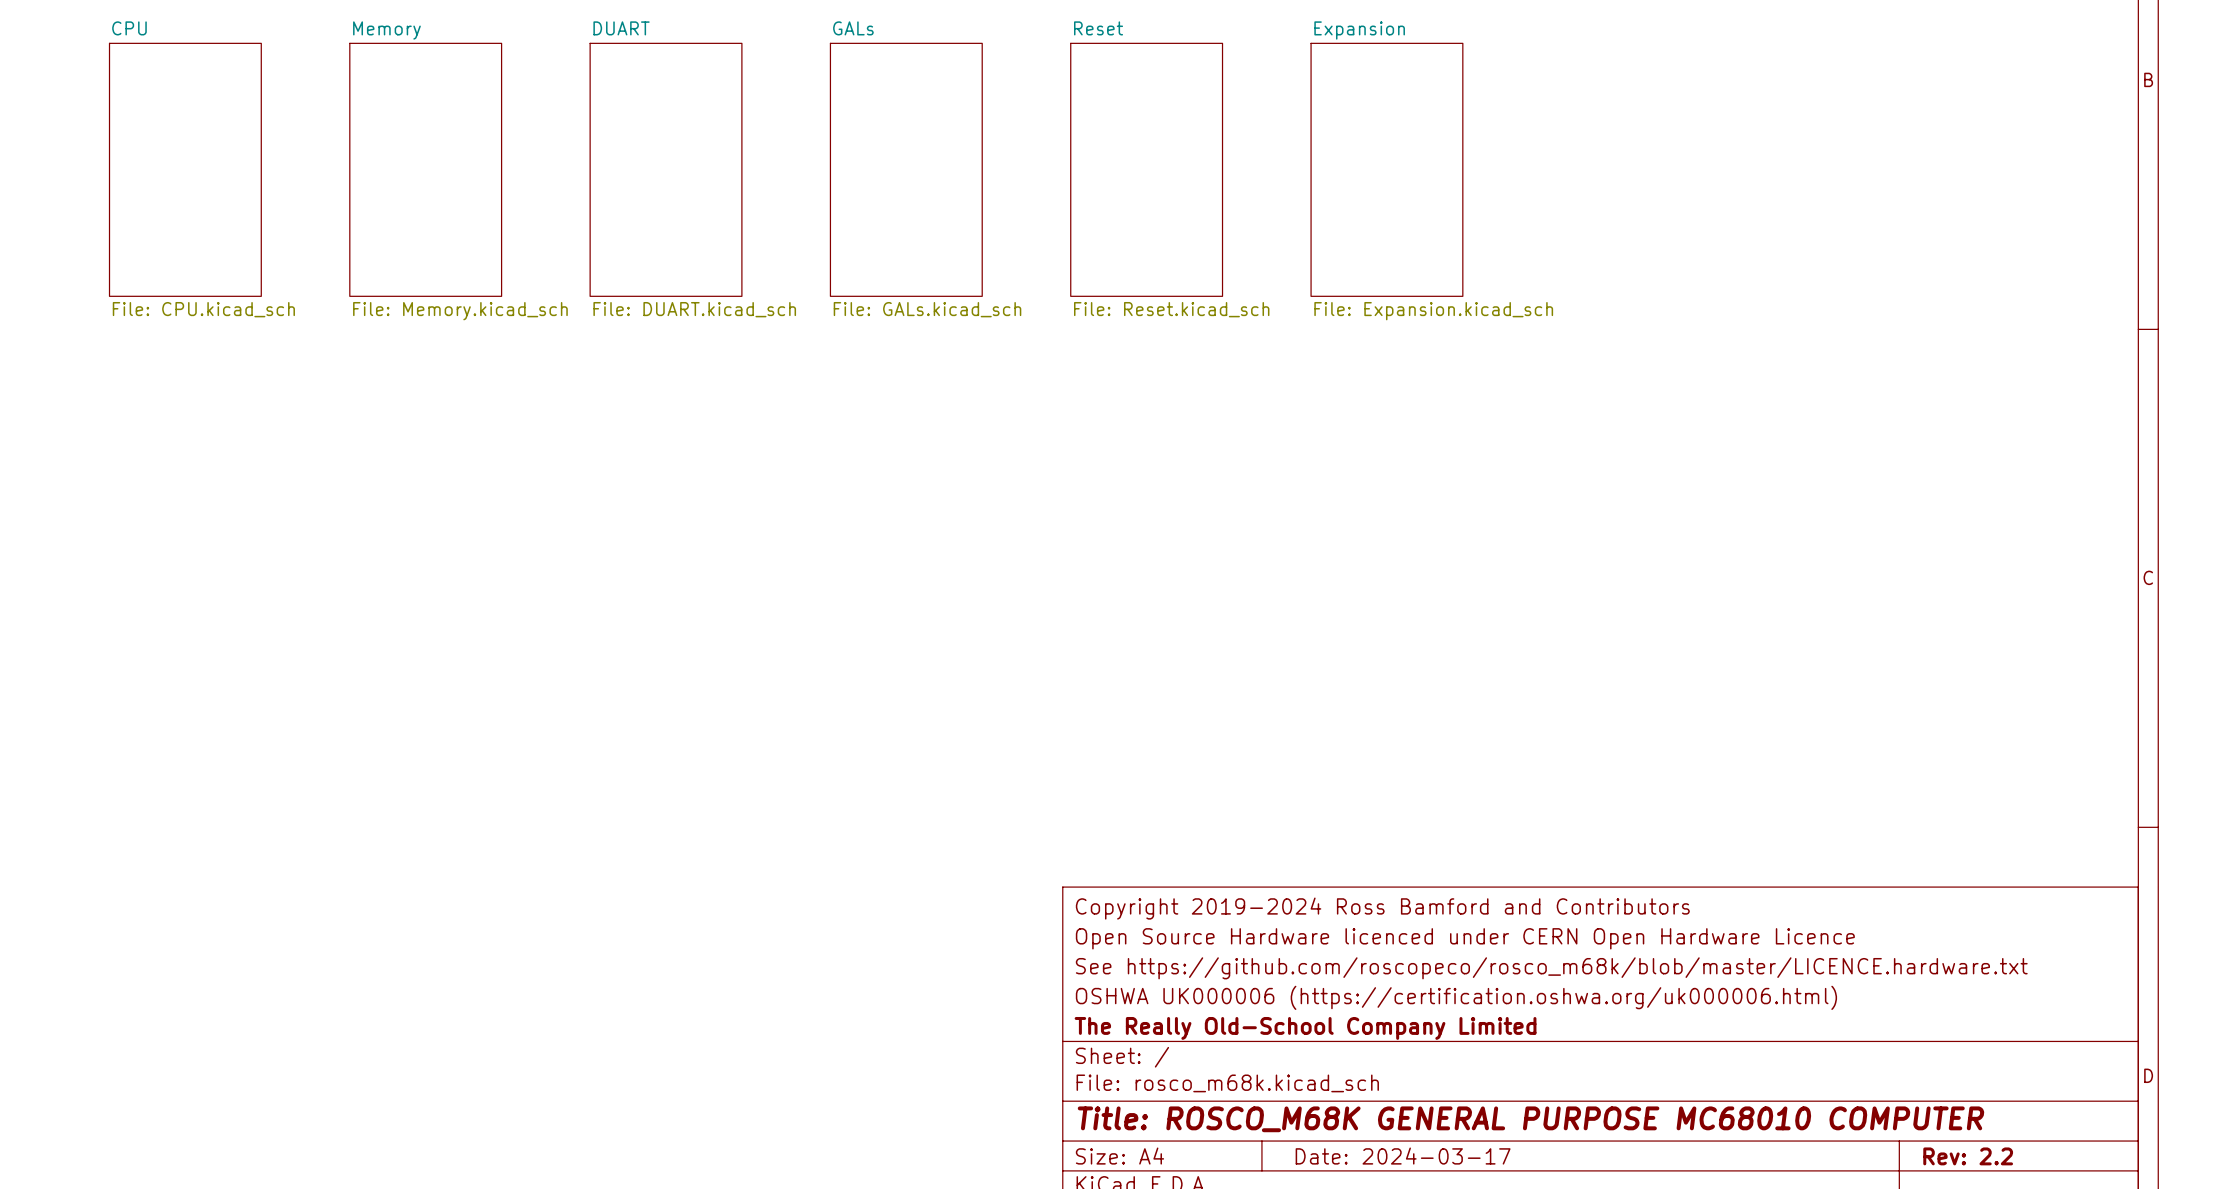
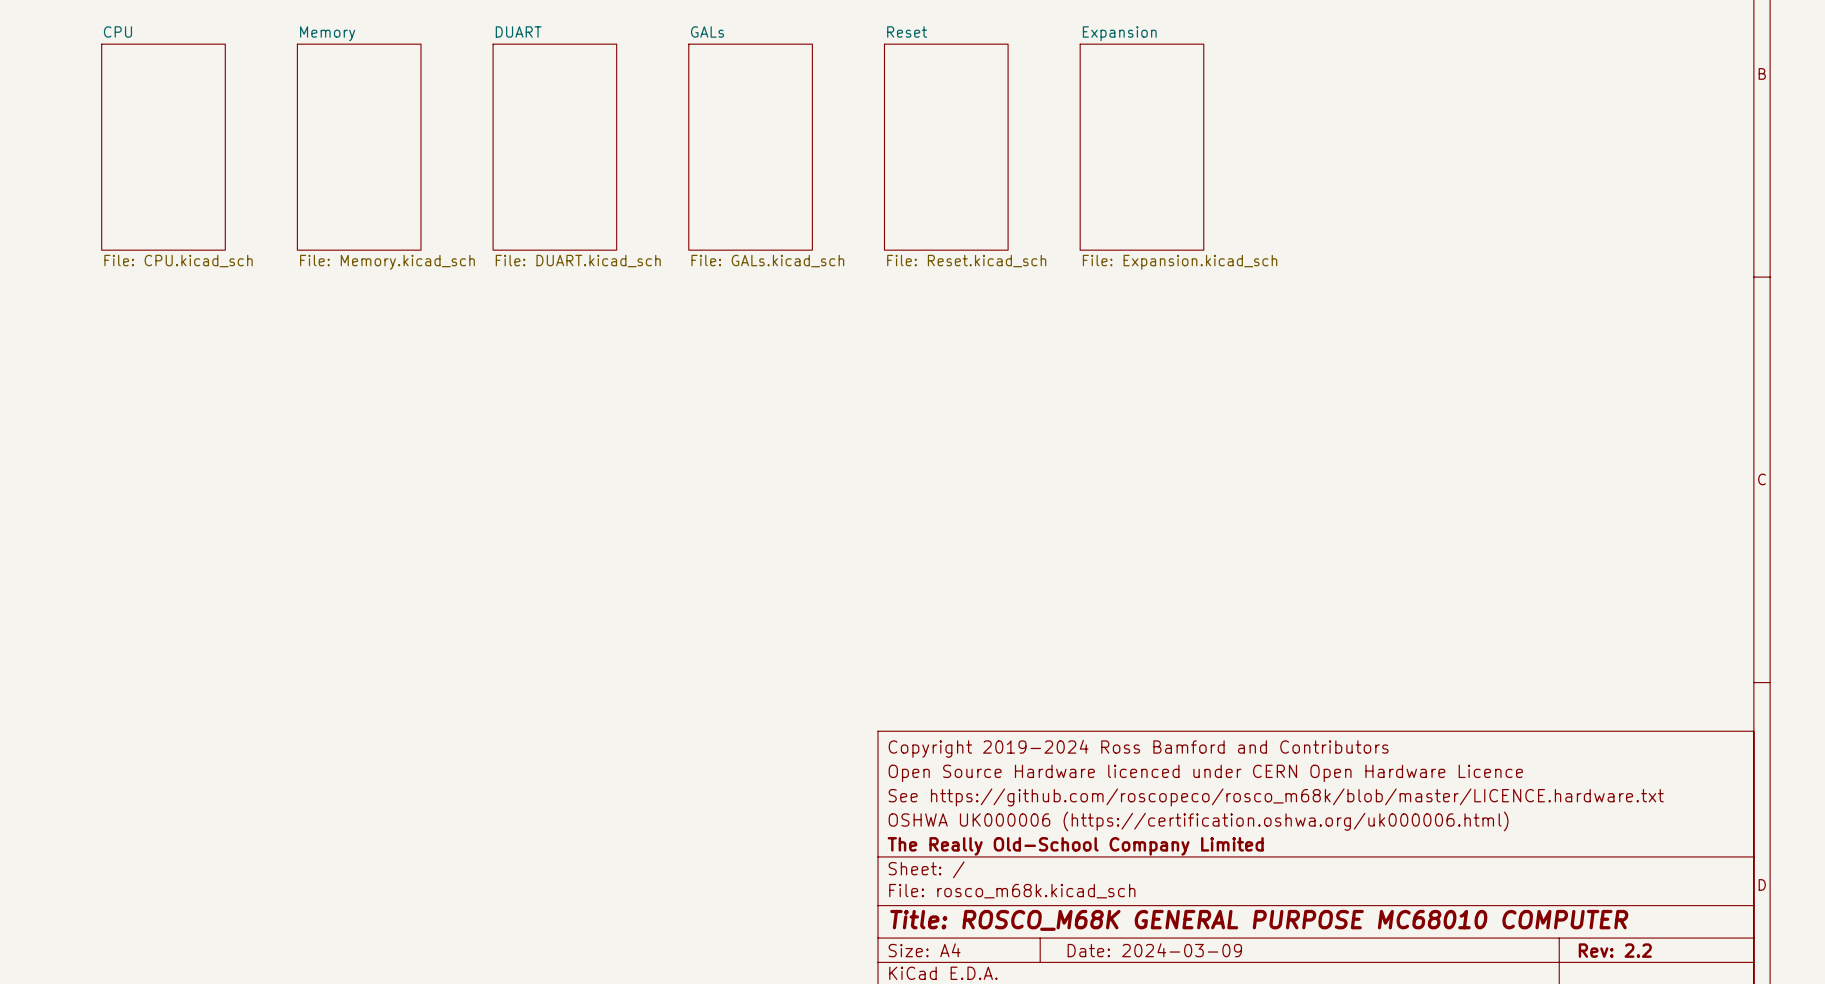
title block: Date: 2024-03-17 (1403, 1156) -> Date: 2024-03-09 (1154, 950)

